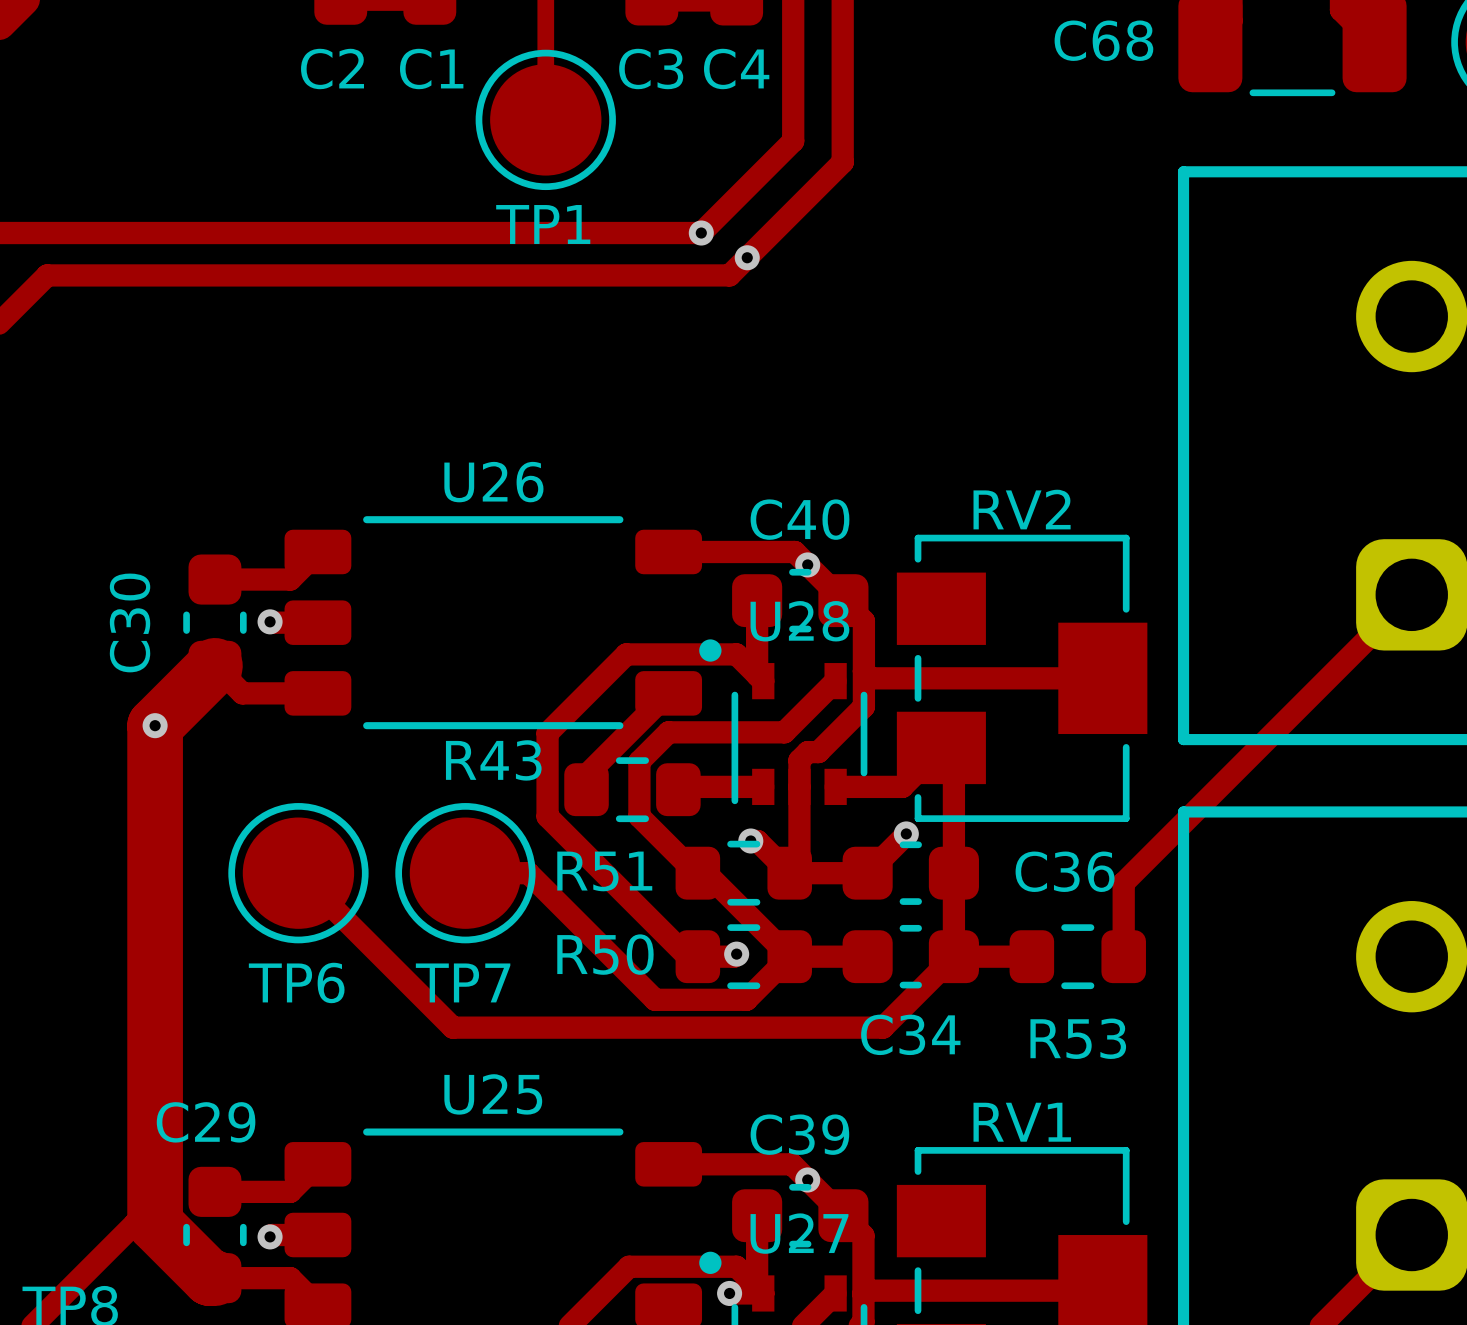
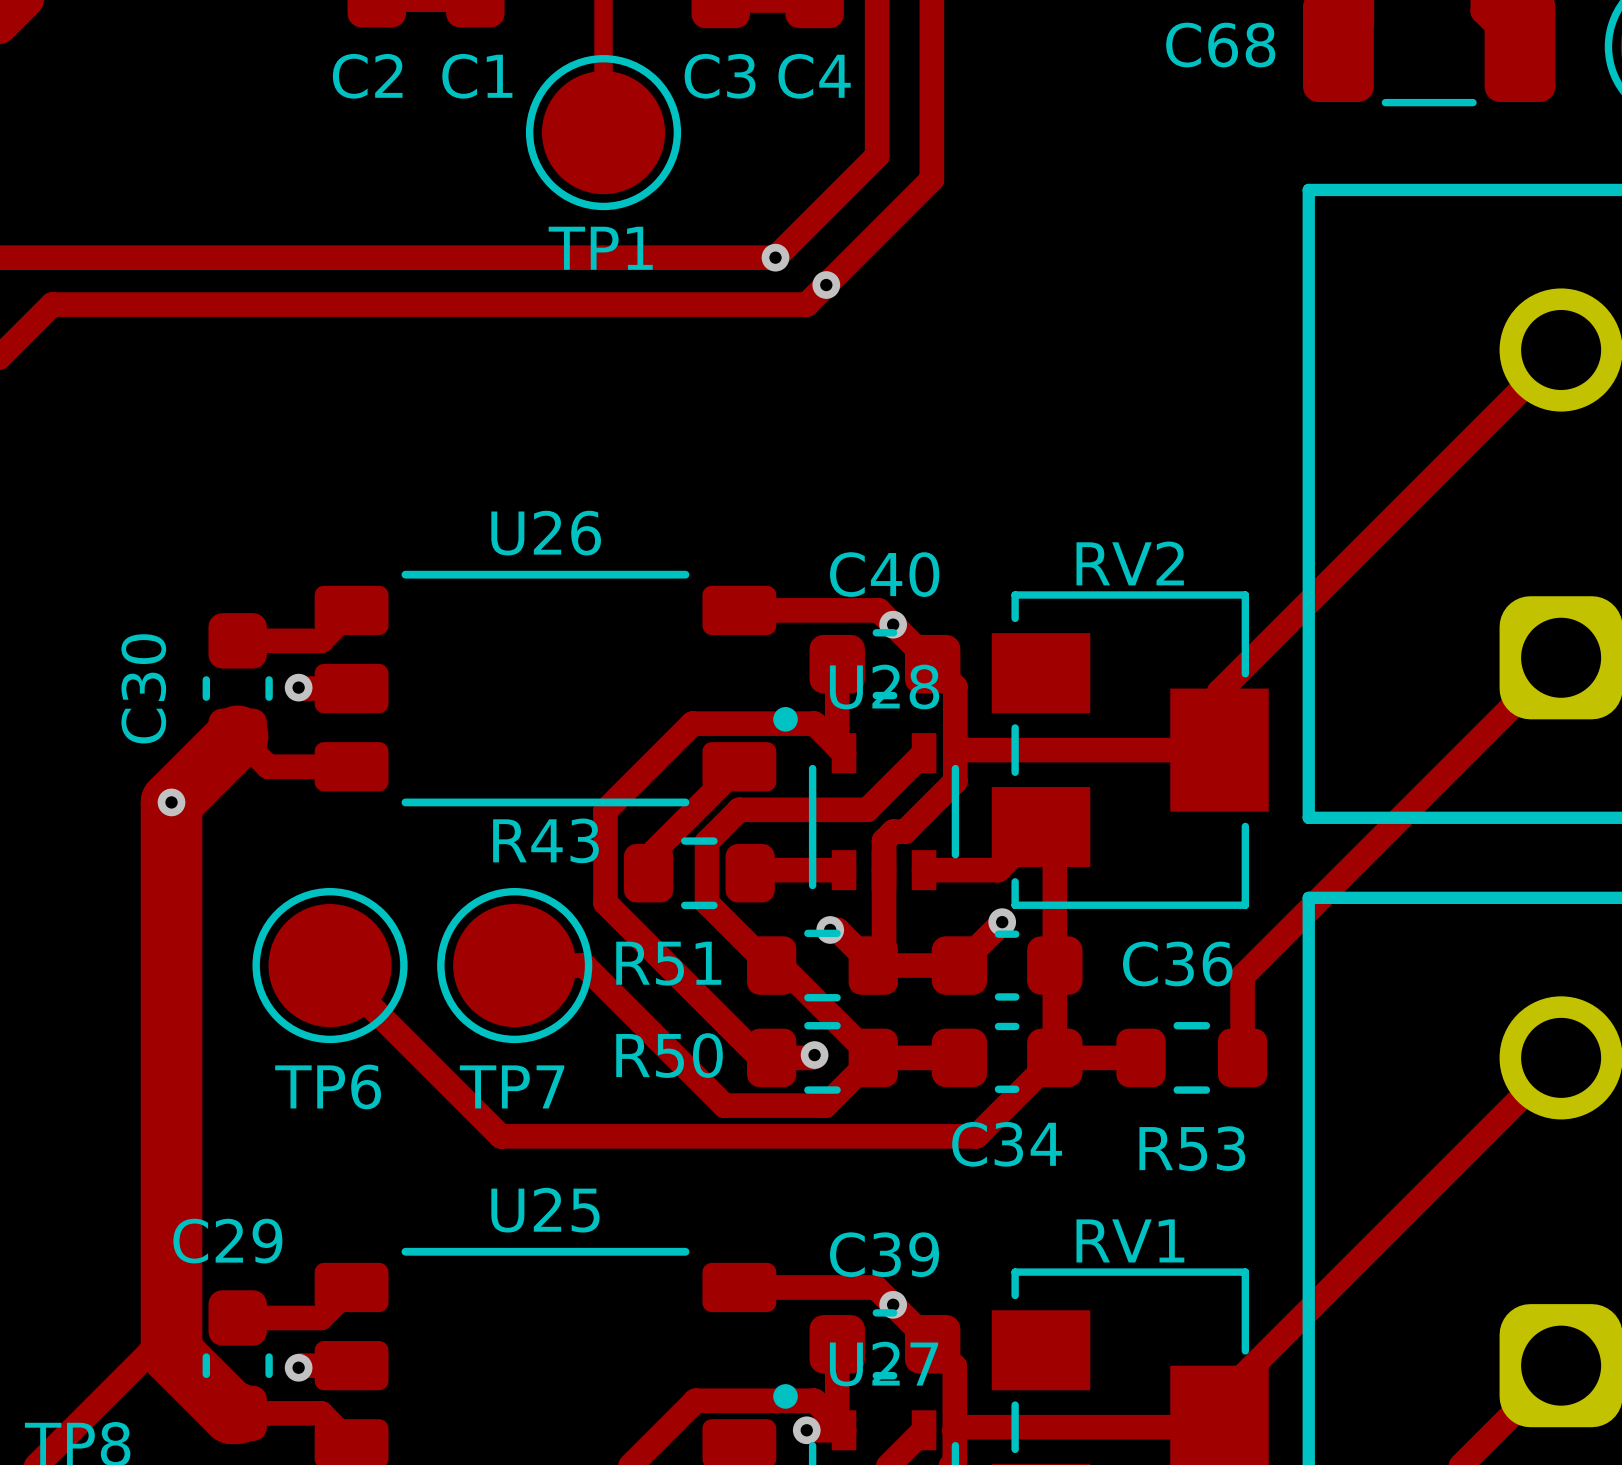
track: none -> (1561, 350) (1219, 691) (1219, 750)
track: none -> (1561, 1057) (1219, 1399) (1219, 1427)

